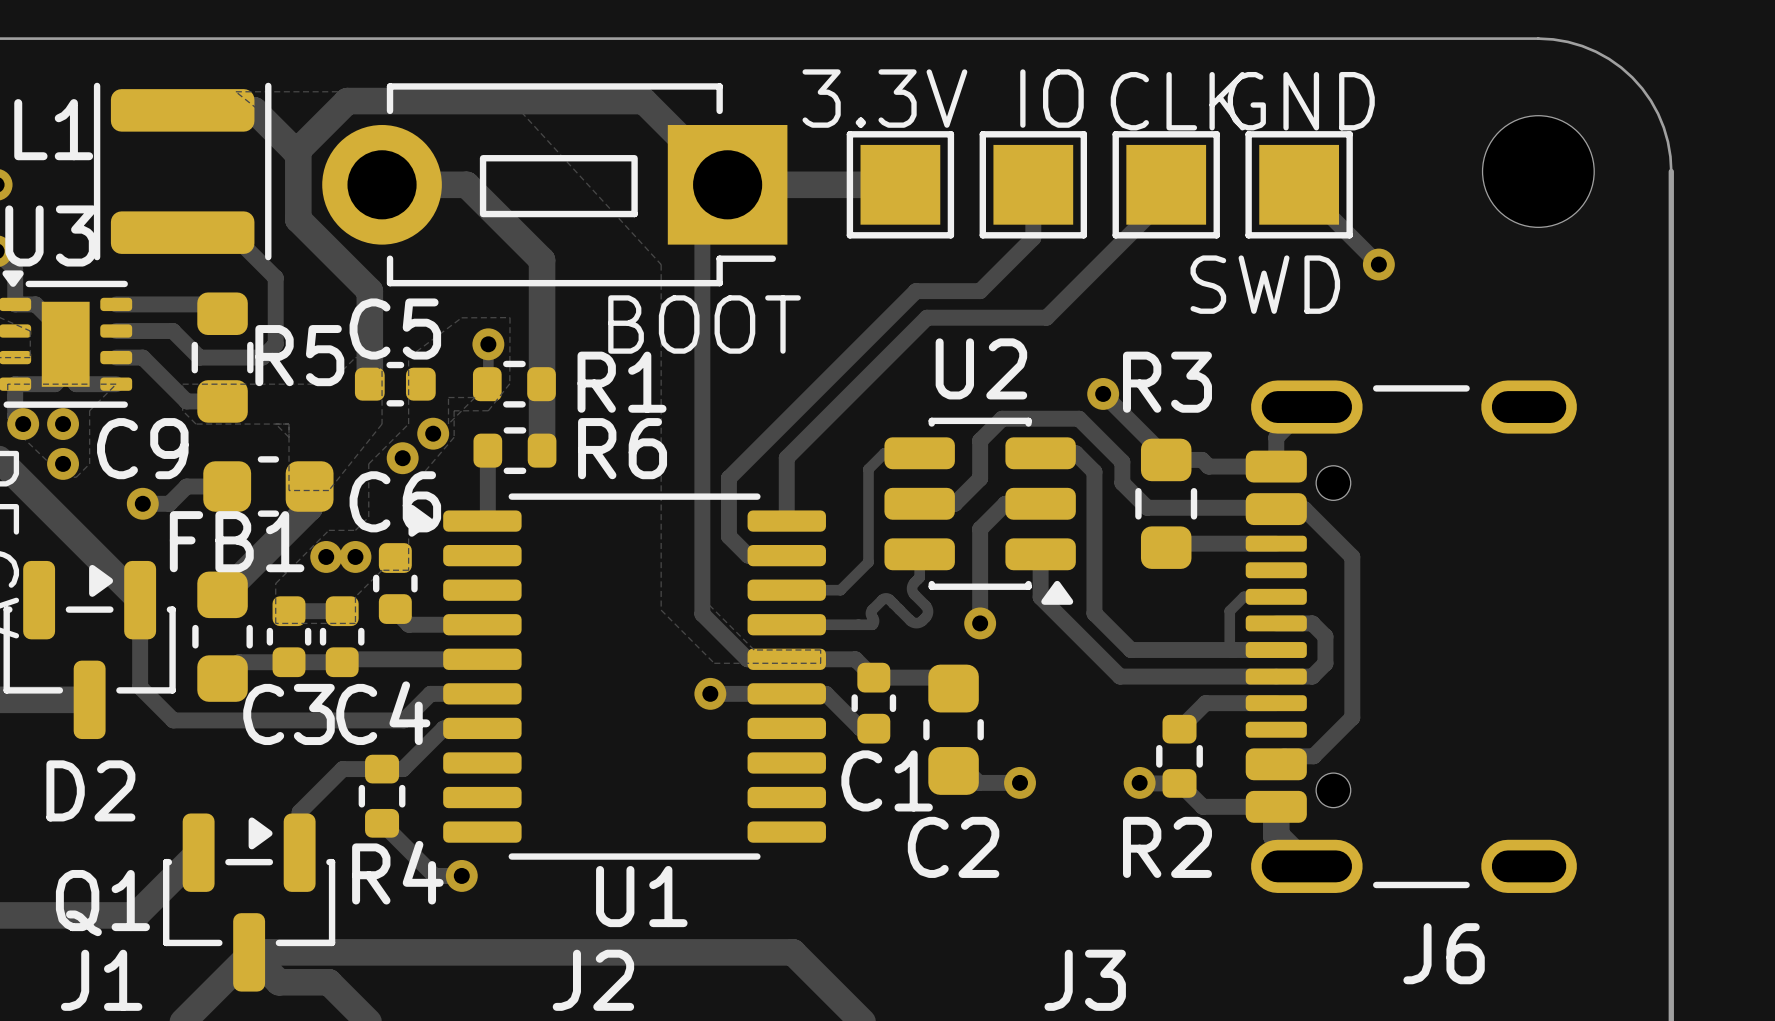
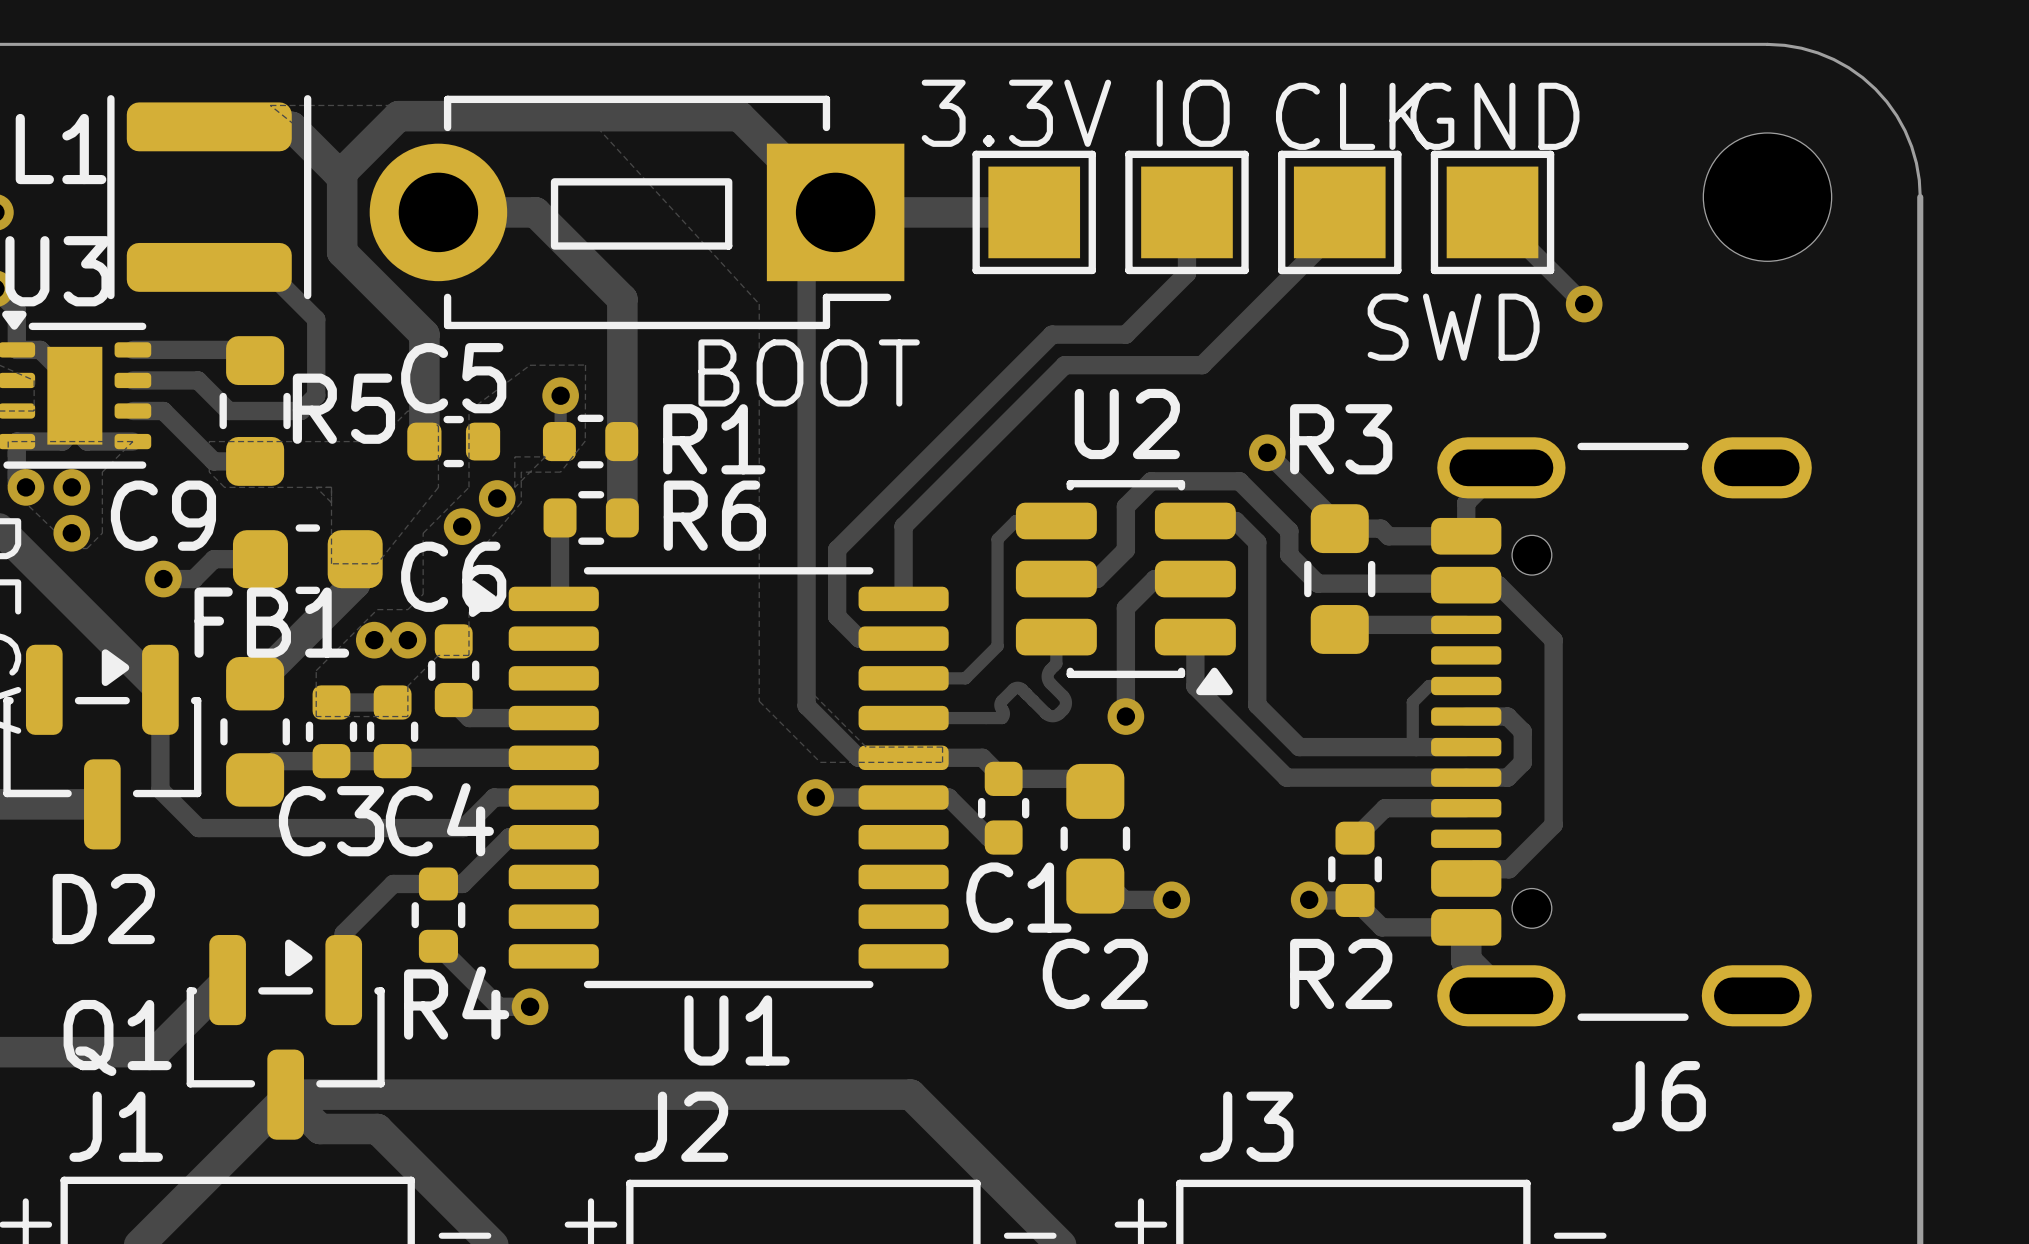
text position: IO (1052, 98) -> IO (1193, 113)

